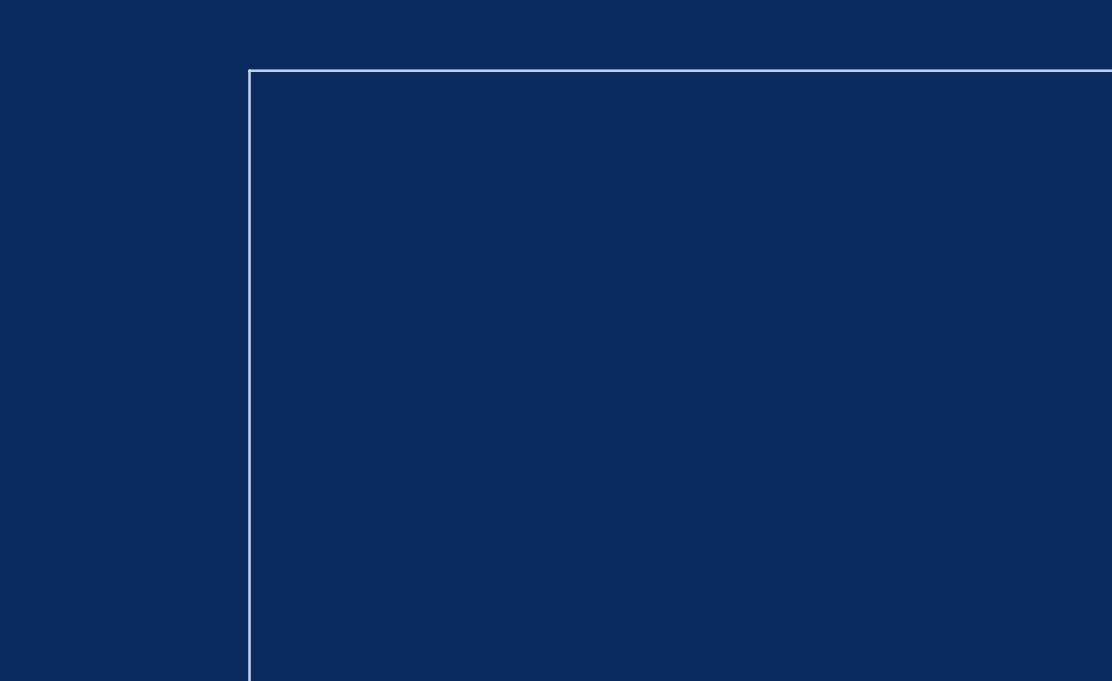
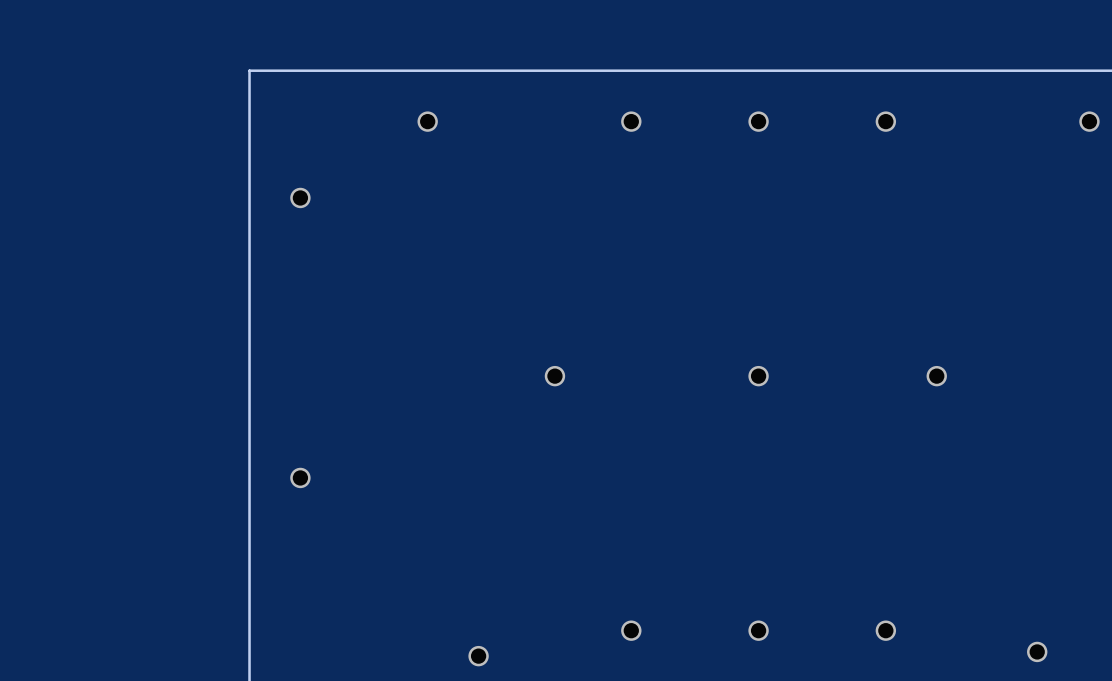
via: none -> (427, 121)
via: none -> (631, 121)
via: none -> (758, 121)
via: none -> (885, 121)
via: none -> (1089, 121)
via: none -> (300, 197)
via: none -> (554, 376)
via: none -> (758, 376)
via: none -> (936, 376)
via: none -> (300, 477)
via: none -> (631, 630)
via: none -> (758, 630)
via: none -> (885, 630)
via: none -> (1037, 651)
via: none -> (478, 656)

